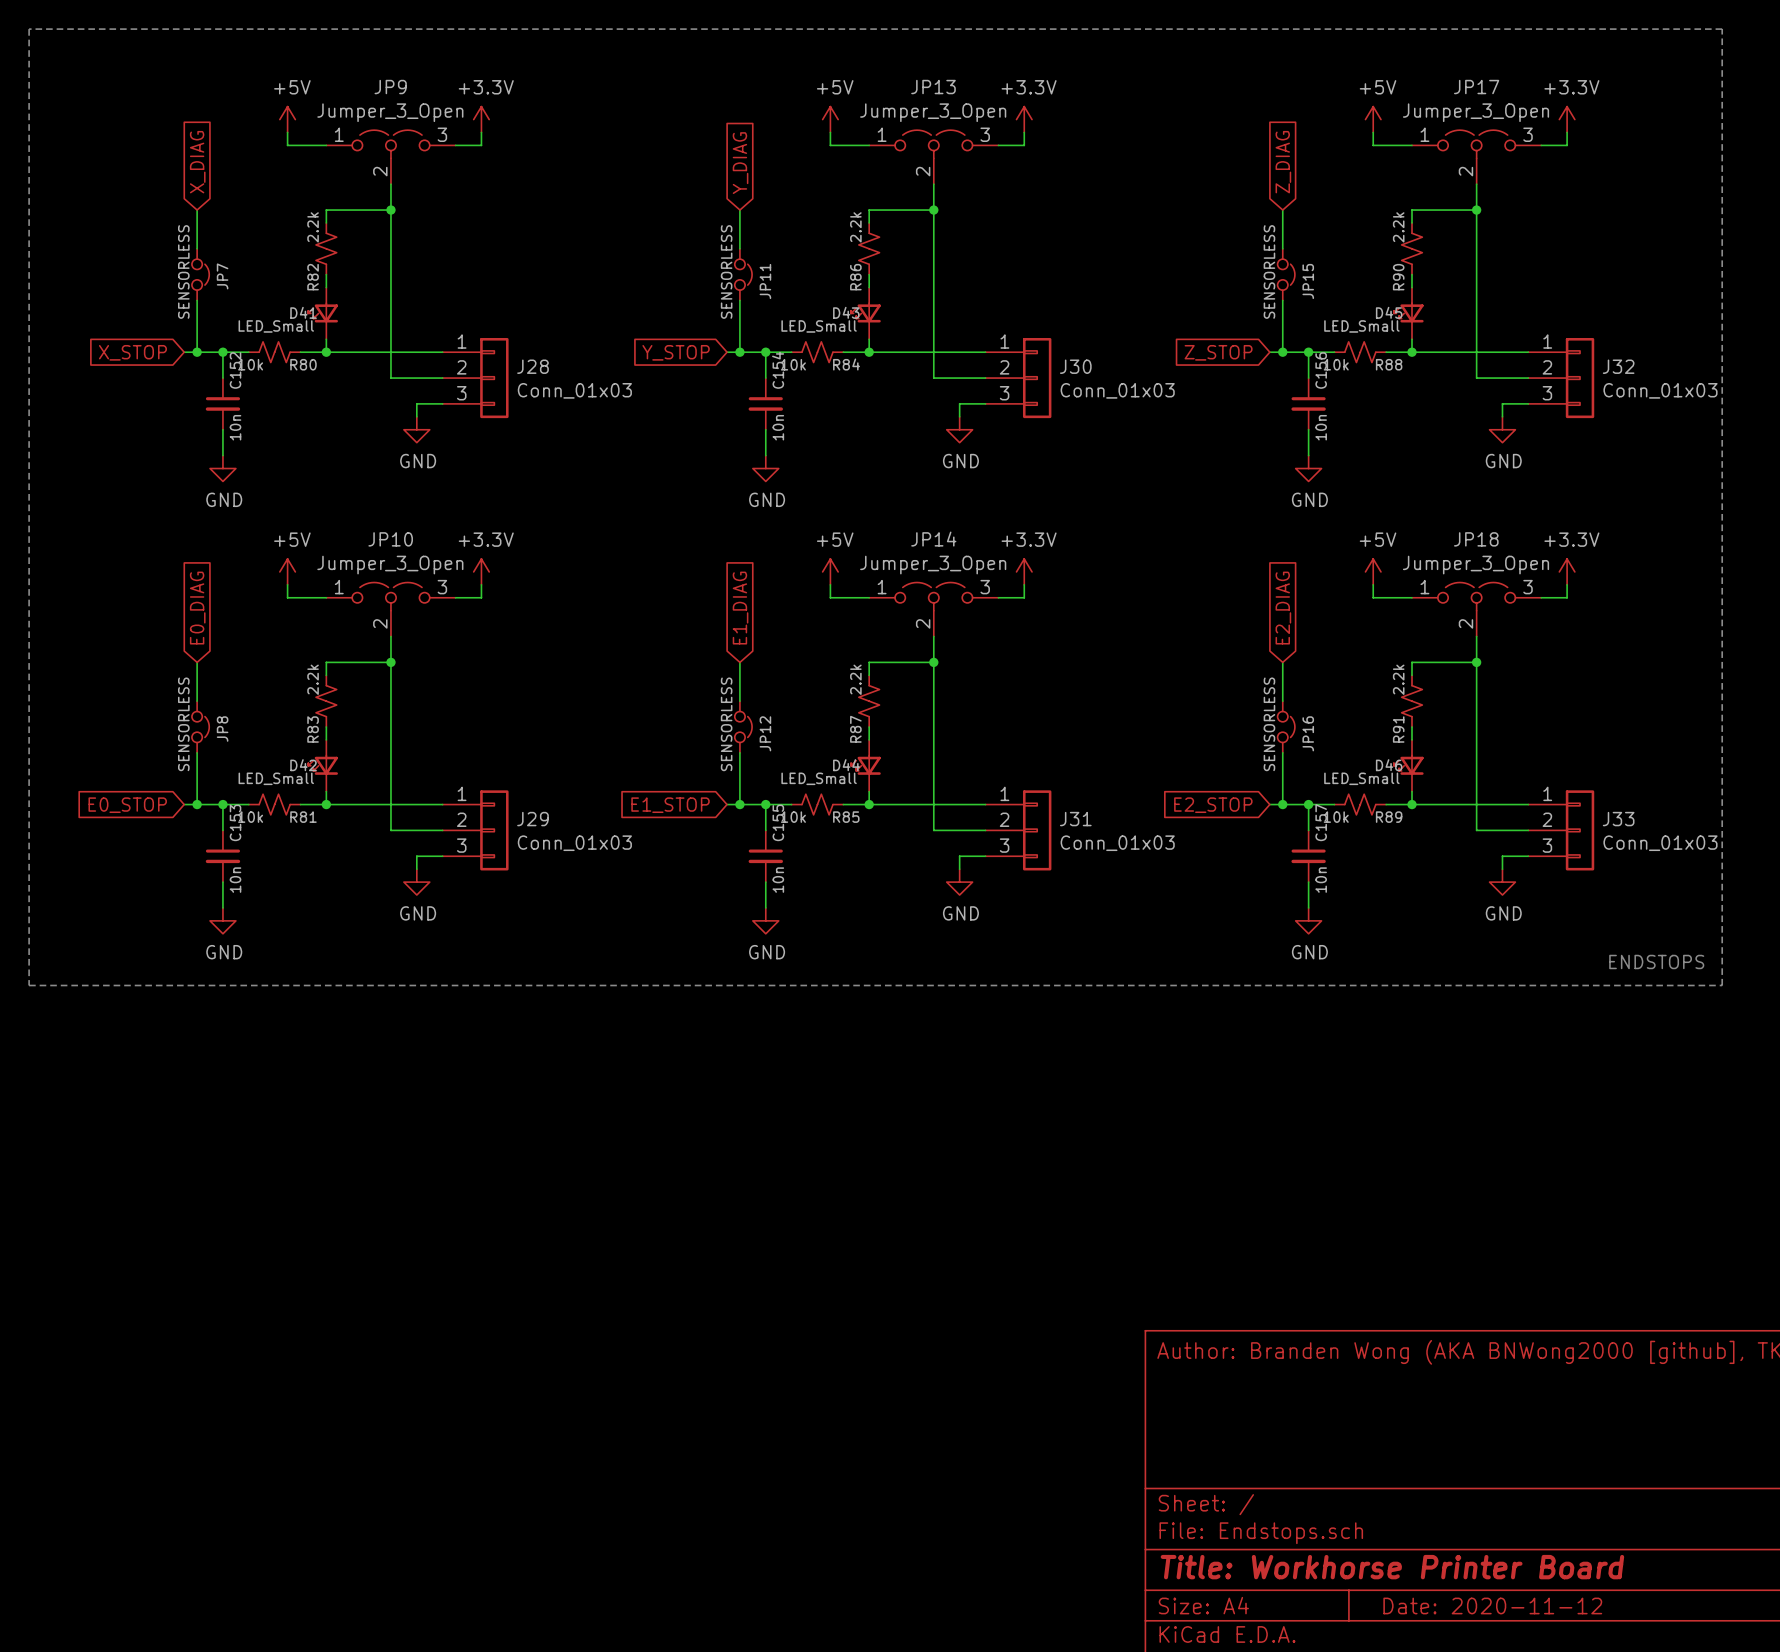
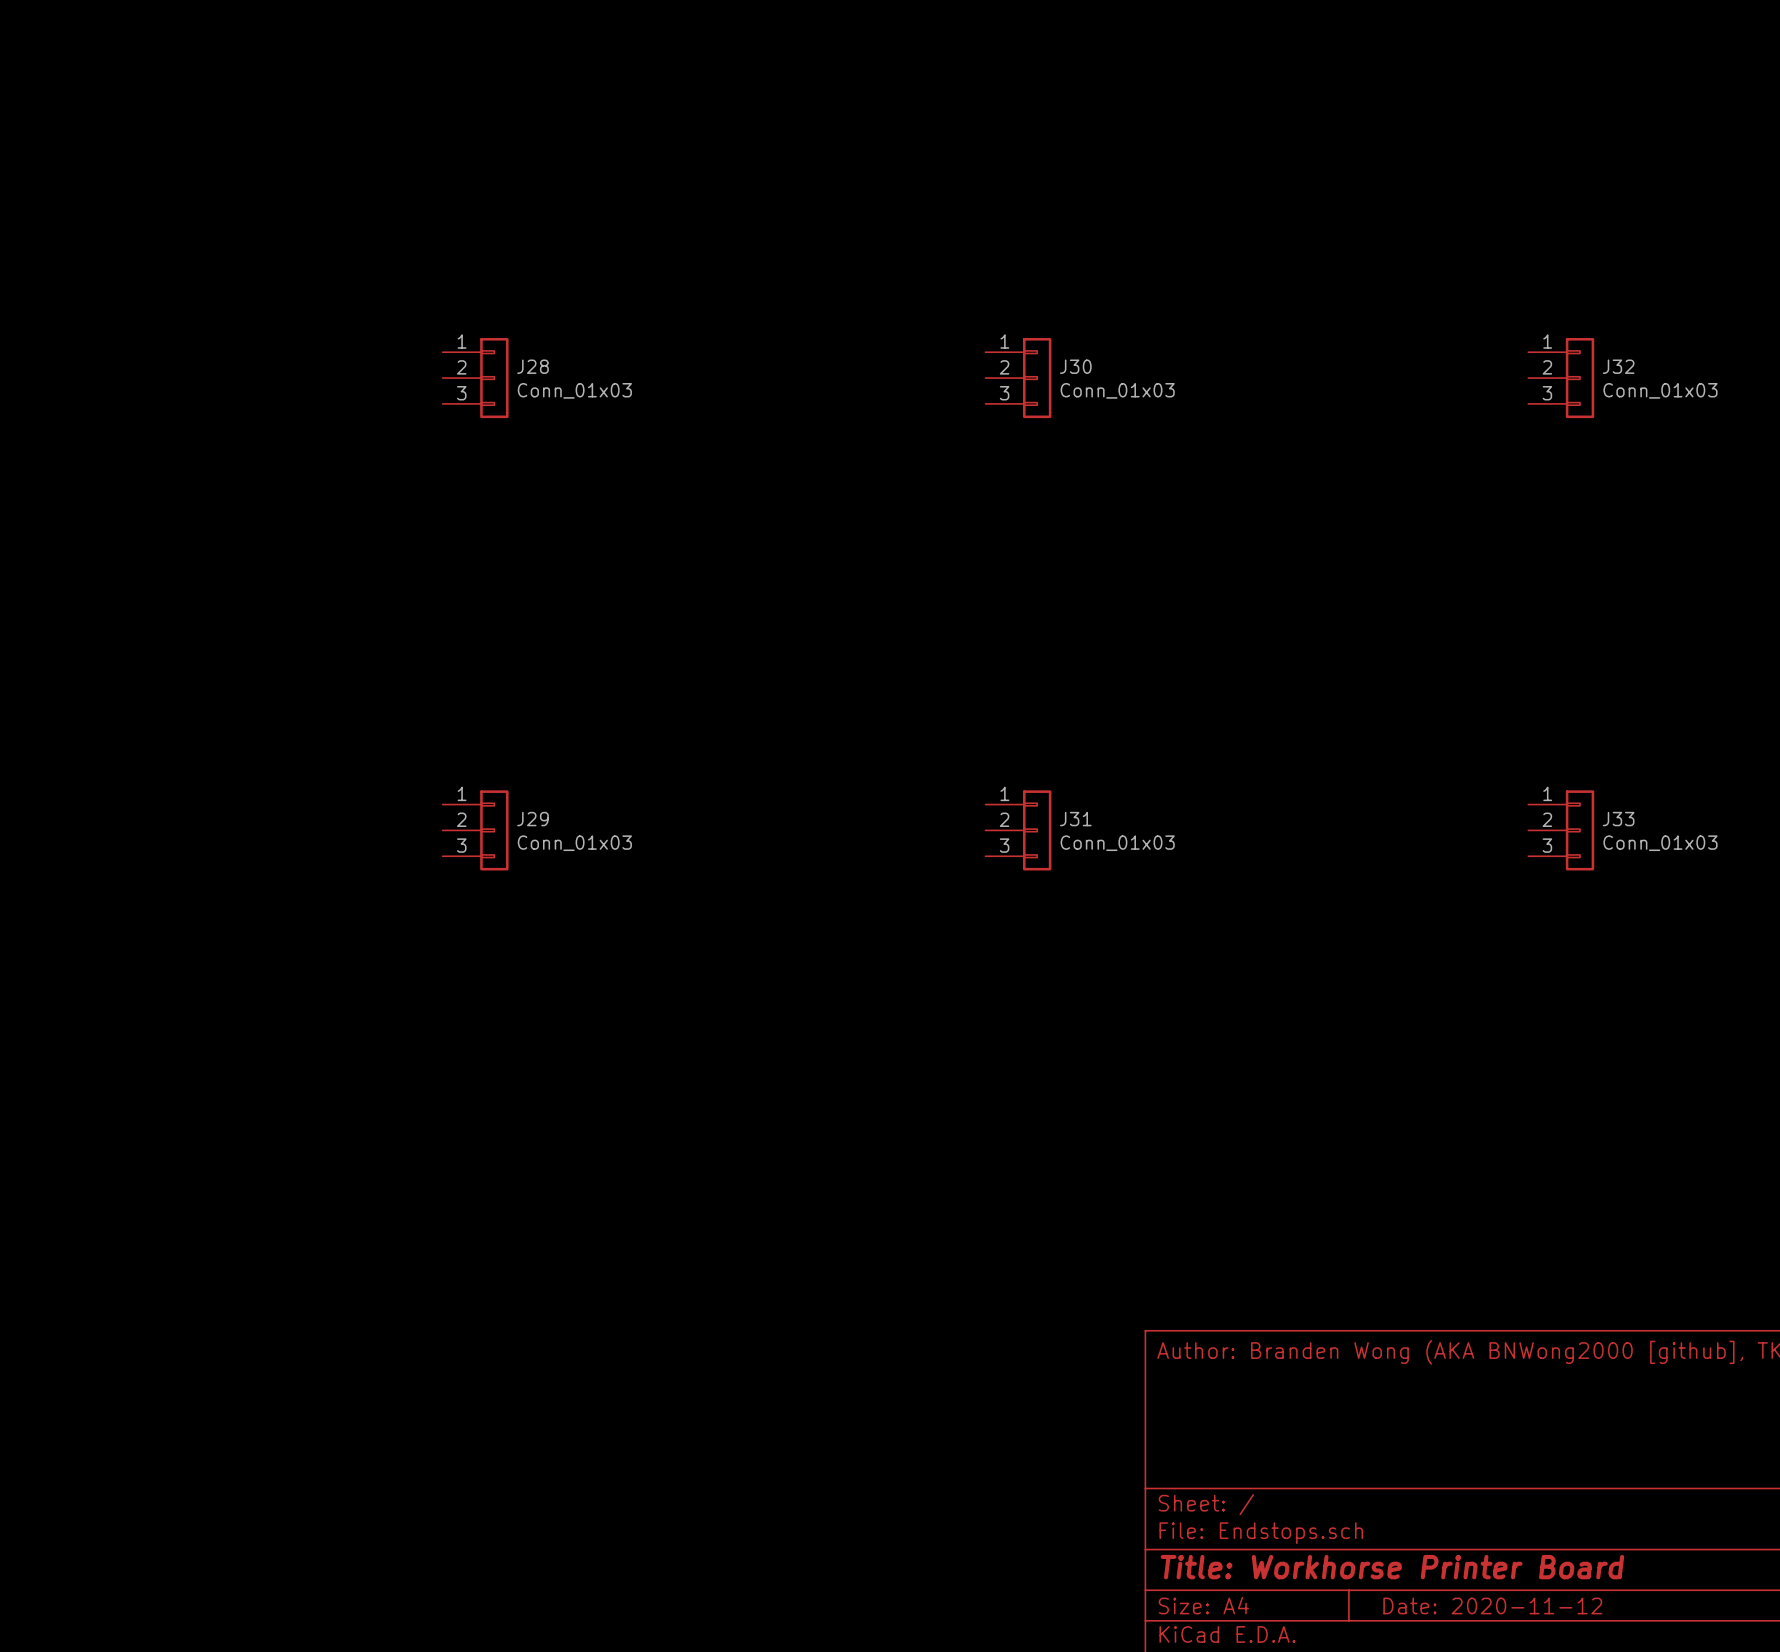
line: (29, 29) (29, 985) (1722, 985) (1722, 29) (29, 29) -> none
power symbol: +5V (287, 119) -> none
power symbol: +3.3V (481, 119) -> none
power symbol: +5V (830, 119) -> none
power symbol: +3.3V (1024, 119) -> none
power symbol: +5V (1373, 119) -> none
power symbol: +3.3V (1567, 119) -> none
wire: (287, 132) (287, 145) (326, 145) -> none
wire: (481, 132) (481, 145) (455, 145) -> none
wire: (830, 132) (830, 145) (869, 145) -> none
wire: (1024, 132) (1024, 145) (998, 145) -> none
wire: (1373, 132) (1373, 145) (1412, 145) -> none
wire: (1567, 132) (1567, 145) (1541, 145) -> none
JP9: Jumper_3_Open (390, 157) -> none
JP13: Jumper_3_Open (933, 157) -> none
JP17: Jumper_3_Open (1476, 157) -> none
global label: X_DIAG (197, 162) -> none
global label: Z_DIAG (1283, 162) -> none
global label: Y_DIAG (740, 163) -> none
wire: (390, 184) (390, 378) (442, 378) -> none
wire: (933, 184) (933, 378) (985, 378) -> none
wire: (1476, 184) (1476, 378) (1528, 378) -> none
wire: (197, 210) (197, 248) -> none
wire: (390, 210) (326, 210) (326, 222) -> none
junction: (390, 210) -> none
wire: (739, 210) (739, 248) -> none
wire: (933, 210) (869, 210) (869, 222) -> none
junction: (933, 210) -> none
wire: (1282, 210) (1282, 248) -> none
wire: (1476, 210) (1412, 210) (1412, 222) -> none
junction: (1476, 210) -> none
R82: 2.2k (326, 248) -> none
R86: 2.2k (869, 248) -> none
R90: 2.2k (1412, 248) -> none
JP7: SENSORLESS (200, 274) -> none
wire: (326, 274) (326, 287) -> none
JP11: SENSORLESS (743, 274) -> none
wire: (869, 274) (869, 287) -> none
JP15: SENSORLESS (1286, 274) -> none
wire: (1412, 274) (1412, 287) -> none
wire: (197, 300) (197, 352) -> none
wire: (739, 300) (739, 352) -> none
wire: (1282, 300) (1282, 352) -> none
D41: LED_Small (323, 313) -> none
D43: LED_Small (865, 313) -> none
D45: LED_Small (1408, 313) -> none
wire: (326, 339) (326, 352) -> none
wire: (869, 339) (869, 352) -> none
wire: (1412, 339) (1412, 352) -> none
global label: X_STOP (132, 352) -> none
wire: (184, 352) (248, 352) -> none
junction: (197, 352) -> none
wire: (222, 352) (222, 378) -> none
junction: (222, 352) -> none
R80: 10k (274, 352) -> none
wire: (300, 352) (442, 352) -> none
junction: (326, 352) -> none
global label: Y_STOP (676, 352) -> none
wire: (727, 352) (791, 352) -> none
junction: (739, 352) -> none
wire: (765, 352) (765, 378) -> none
junction: (765, 352) -> none
R84: 10k (817, 352) -> none
wire: (843, 352) (985, 352) -> none
junction: (869, 352) -> none
global label: Z_STOP (1218, 352) -> none
wire: (1269, 352) (1334, 352) -> none
junction: (1282, 352) -> none
wire: (1308, 352) (1308, 378) -> none
junction: (1308, 352) -> none
R88: 10k (1360, 352) -> none
wire: (1386, 352) (1528, 352) -> none
junction: (1412, 352) -> none
C152: 10n (222, 403) -> none
wire: (442, 403) (416, 403) (416, 416) -> none
C154: 10n (765, 403) -> none
wire: (985, 403) (959, 403) (959, 416) -> none
C156: 10n (1308, 403) -> none
wire: (1528, 403) (1502, 403) (1502, 416) -> none
wire: (222, 429) (222, 455) -> none
power symbol: GND (416, 429) -> none
wire: (765, 429) (765, 455) -> none
power symbol: GND (959, 429) -> none
wire: (1308, 429) (1308, 455) -> none
power symbol: GND (1502, 429) -> none
power symbol: GND (222, 468) -> none
power symbol: GND (765, 468) -> none
power symbol: GND (1308, 468) -> none
power symbol: +5V (287, 571) -> none
power symbol: +3.3V (481, 571) -> none
power symbol: +5V (830, 571) -> none
power symbol: +3.3V (1024, 571) -> none
power symbol: +5V (1373, 571) -> none
power symbol: +3.3V (1567, 571) -> none
wire: (287, 584) (287, 597) (326, 597) -> none
wire: (481, 584) (481, 597) (455, 597) -> none
wire: (830, 584) (830, 597) (869, 597) -> none
wire: (1024, 584) (1024, 597) (998, 597) -> none
wire: (1373, 584) (1373, 597) (1412, 597) -> none
wire: (1567, 584) (1567, 597) (1541, 597) -> none
global label: E0_DIAG (197, 608) -> none
global label: E1_DIAG (740, 608) -> none
global label: E2_DIAG (1283, 608) -> none
JP10: Jumper_3_Open (390, 609) -> none
JP14: Jumper_3_Open (933, 609) -> none
JP18: Jumper_3_Open (1476, 609) -> none
wire: (390, 636) (390, 830) (442, 830) -> none
wire: (933, 636) (933, 830) (985, 830) -> none
wire: (1476, 636) (1476, 830) (1528, 830) -> none
wire: (197, 662) (197, 701) -> none
wire: (390, 662) (326, 662) (326, 675) -> none
junction: (390, 662) -> none
wire: (739, 662) (739, 701) -> none
wire: (933, 662) (869, 662) (869, 675) -> none
junction: (933, 662) -> none
wire: (1282, 662) (1282, 701) -> none
wire: (1476, 662) (1412, 662) (1412, 675) -> none
junction: (1476, 662) -> none
R83: 2.2k (326, 701) -> none
R87: 2.2k (869, 701) -> none
R91: 2.2k (1412, 701) -> none
JP8: SENSORLESS (200, 727) -> none
wire: (326, 727) (326, 739) -> none
JP12: SENSORLESS (743, 727) -> none
wire: (869, 727) (869, 739) -> none
JP16: SENSORLESS (1286, 727) -> none
wire: (1412, 727) (1412, 739) -> none
wire: (197, 752) (197, 804) -> none
wire: (739, 752) (739, 804) -> none
wire: (1282, 752) (1282, 804) -> none
D42: LED_Small (323, 765) -> none
D44: LED_Small (865, 765) -> none
D46: LED_Small (1408, 765) -> none
wire: (326, 791) (326, 804) -> none
wire: (869, 791) (869, 804) -> none
wire: (1412, 791) (1412, 804) -> none
wire: (184, 804) (248, 804) -> none
junction: (197, 804) -> none
wire: (222, 804) (222, 830) -> none
junction: (222, 804) -> none
R81: 10k (274, 804) -> none
wire: (300, 804) (442, 804) -> none
junction: (326, 804) -> none
wire: (727, 804) (791, 804) -> none
junction: (739, 804) -> none
wire: (765, 804) (765, 830) -> none
junction: (765, 804) -> none
R85: 10k (817, 804) -> none
wire: (843, 804) (985, 804) -> none
junction: (869, 804) -> none
wire: (1269, 804) (1334, 804) -> none
junction: (1282, 804) -> none
wire: (1308, 804) (1308, 830) -> none
junction: (1308, 804) -> none
R89: 10k (1360, 804) -> none
wire: (1386, 804) (1528, 804) -> none
junction: (1412, 804) -> none
global label: E0_STOP (127, 805) -> none
global label: E1_STOP (670, 805) -> none
global label: E2_STOP (1213, 805) -> none
C153: 10n (222, 856) -> none
wire: (442, 856) (416, 856) (416, 869) -> none
C155: 10n (765, 856) -> none
wire: (985, 856) (959, 856) (959, 869) -> none
C157: 10n (1308, 856) -> none
wire: (1528, 856) (1502, 856) (1502, 869) -> none
wire: (222, 882) (222, 907) -> none
power symbol: GND (416, 882) -> none
wire: (765, 882) (765, 907) -> none
power symbol: GND (959, 882) -> none
wire: (1308, 882) (1308, 907) -> none
power symbol: GND (1502, 882) -> none
power symbol: GND (222, 920) -> none
power symbol: GND (765, 920) -> none
power symbol: GND (1308, 920) -> none
text: ENDSTOPS (1656, 961) -> none

